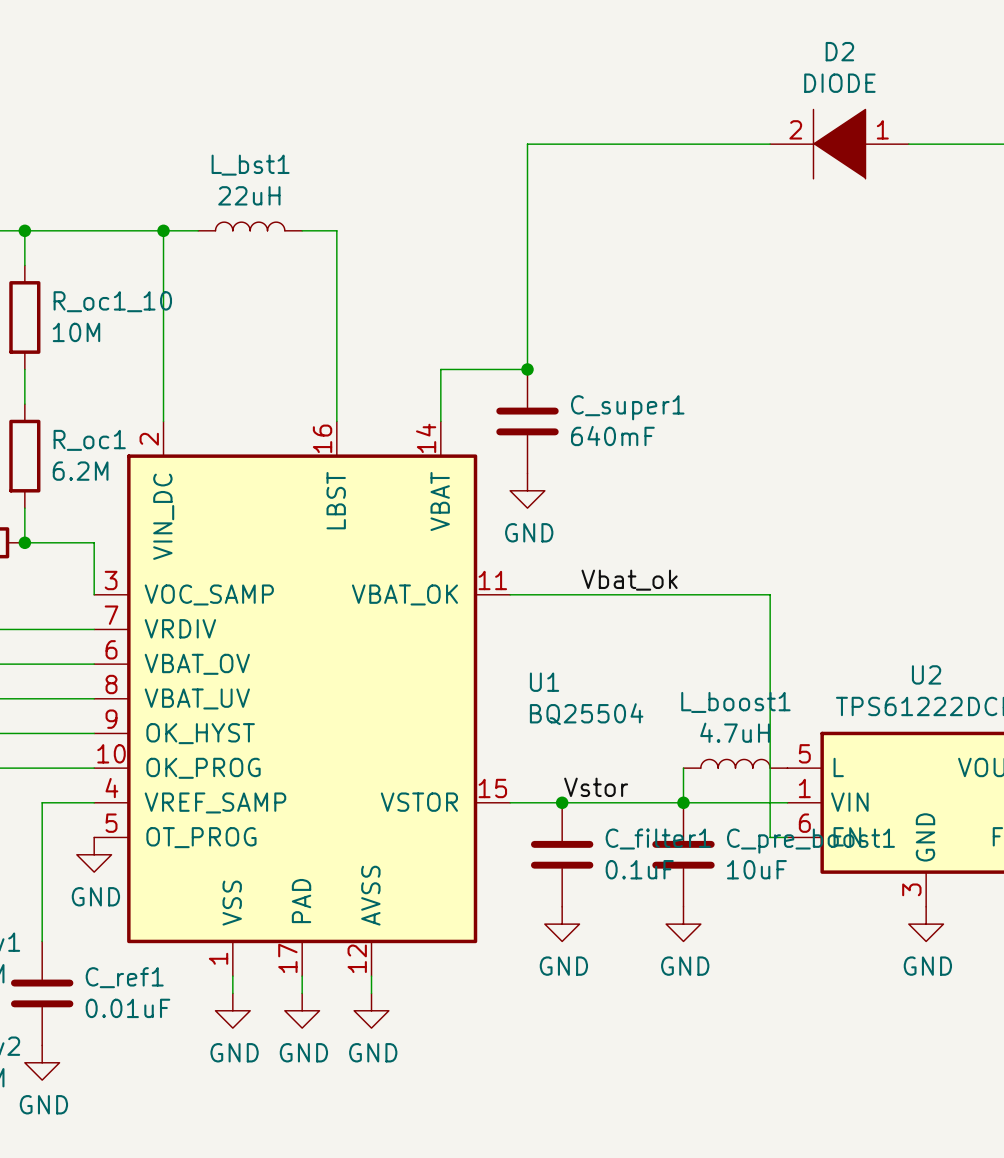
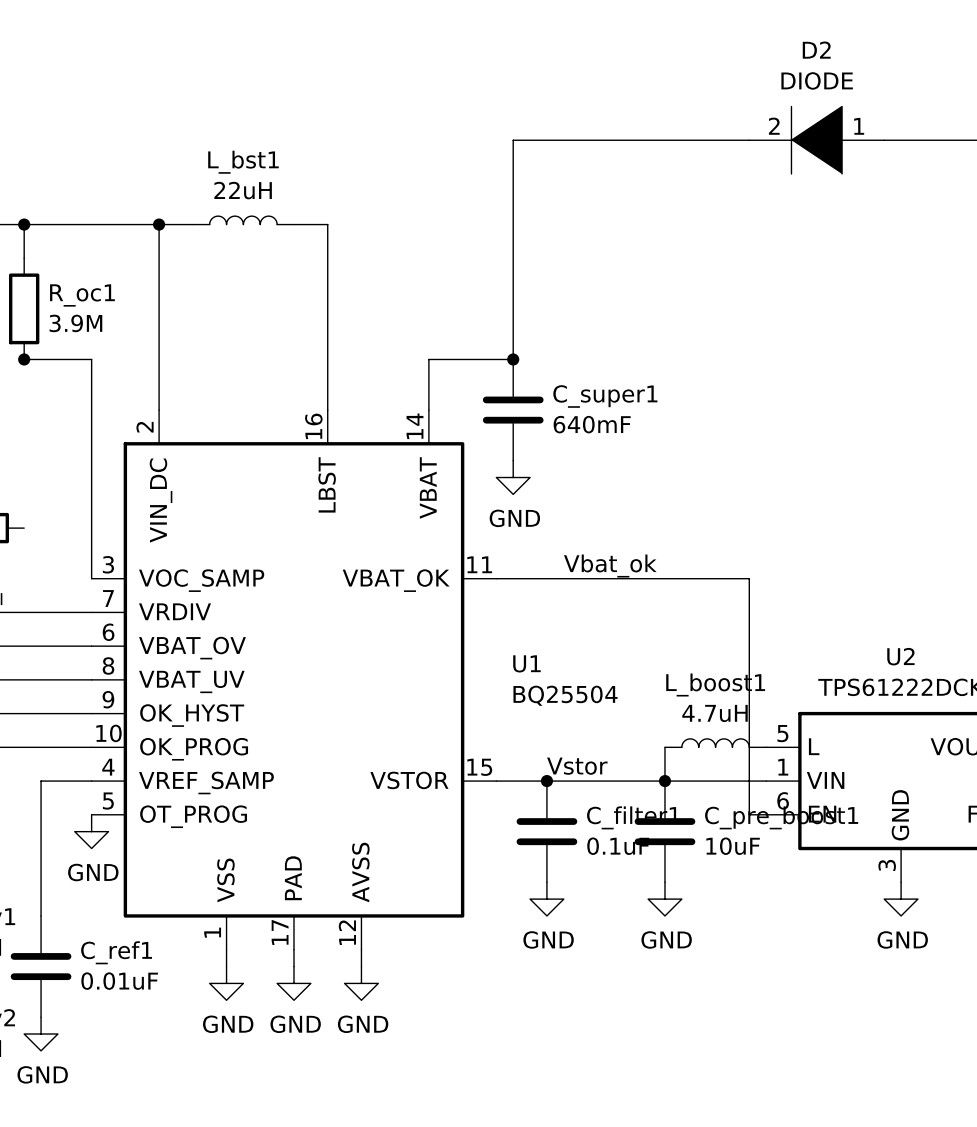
R_oc1_10 name: R_oc1_10 (112, 301) -> R_oc1 (82, 295)
R_oc1_10 value: 10M (76, 332) -> 3.9M (75, 323)
wire: (24, 369) (24, 404) -> none
junction: none -> (24, 359)
R_oc1: 6.2M (24, 456) -> none
wire: (24, 508) (24, 542) (94, 542) -> (24, 359) (91, 359) (91, 528)
junction: (24, 542) -> none

